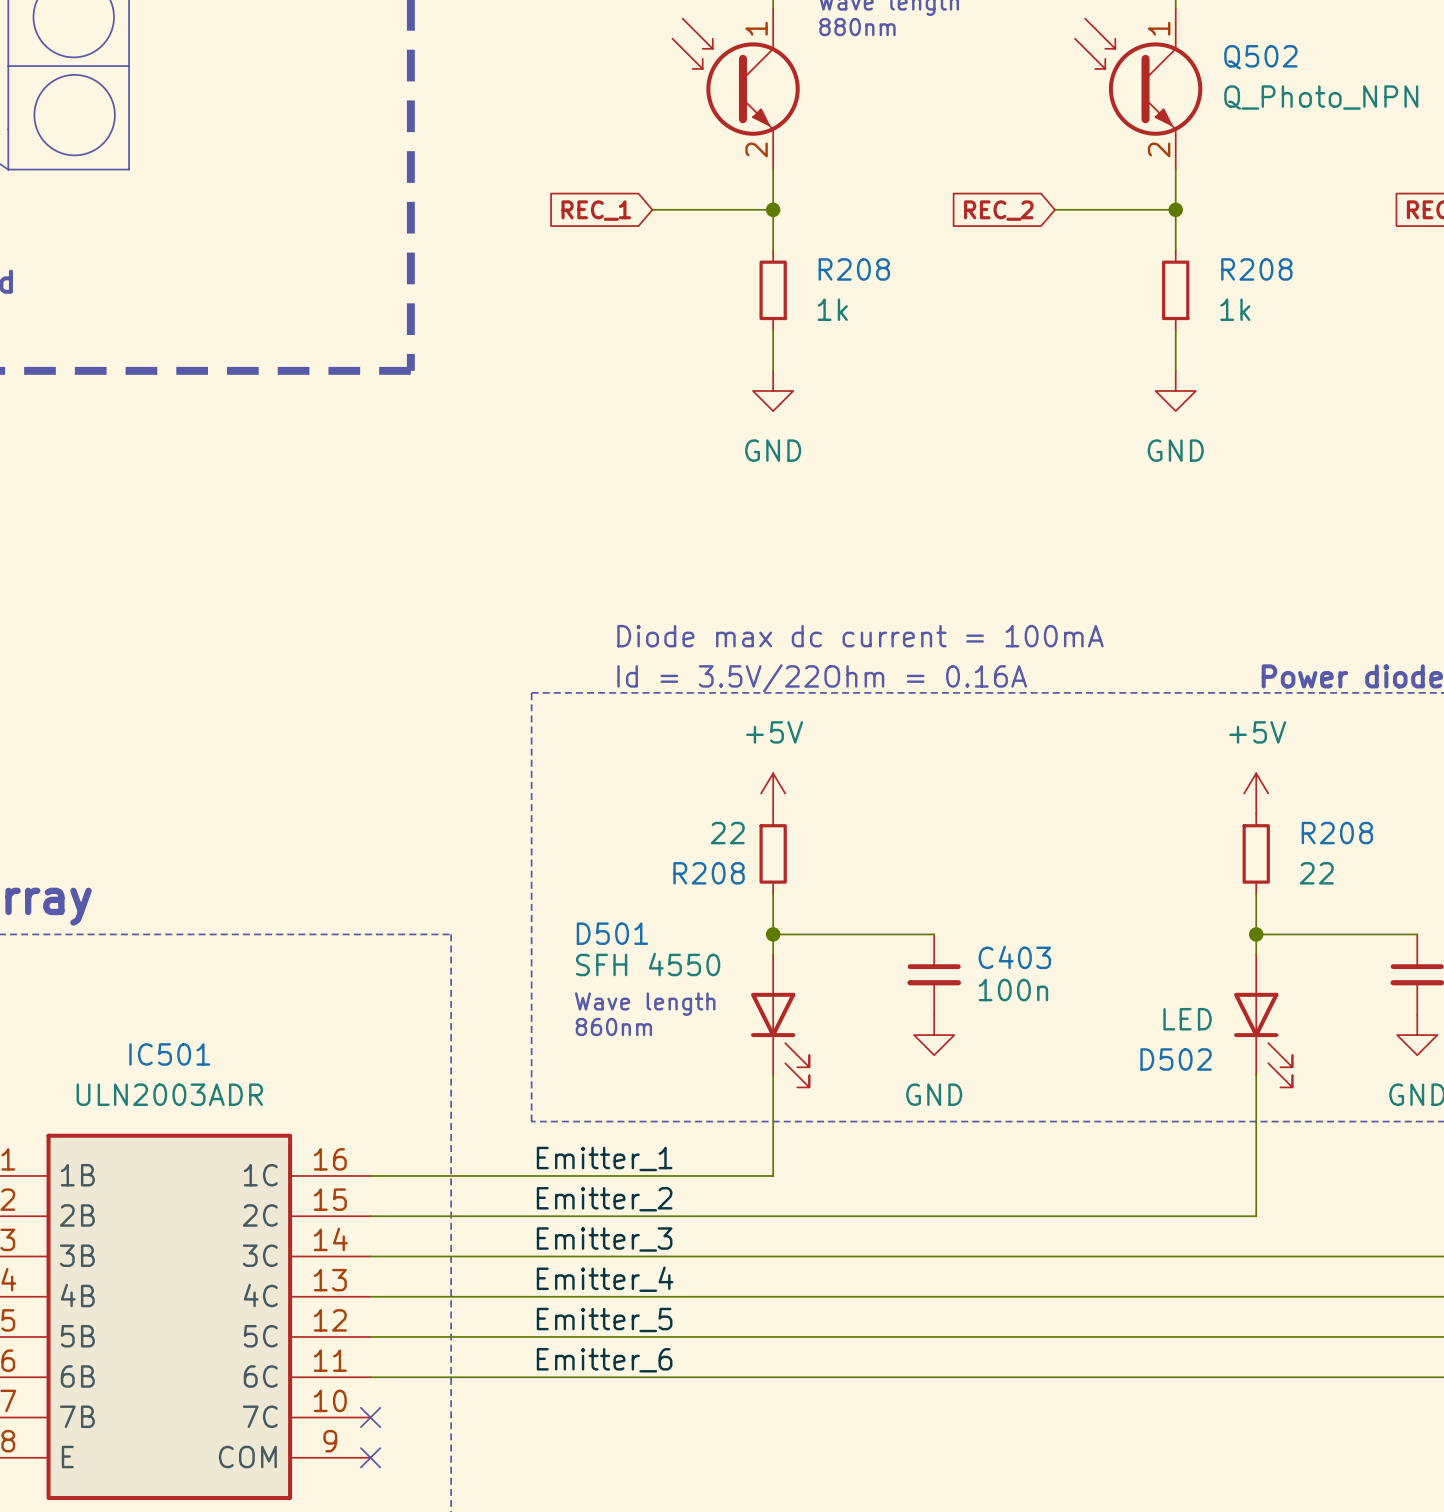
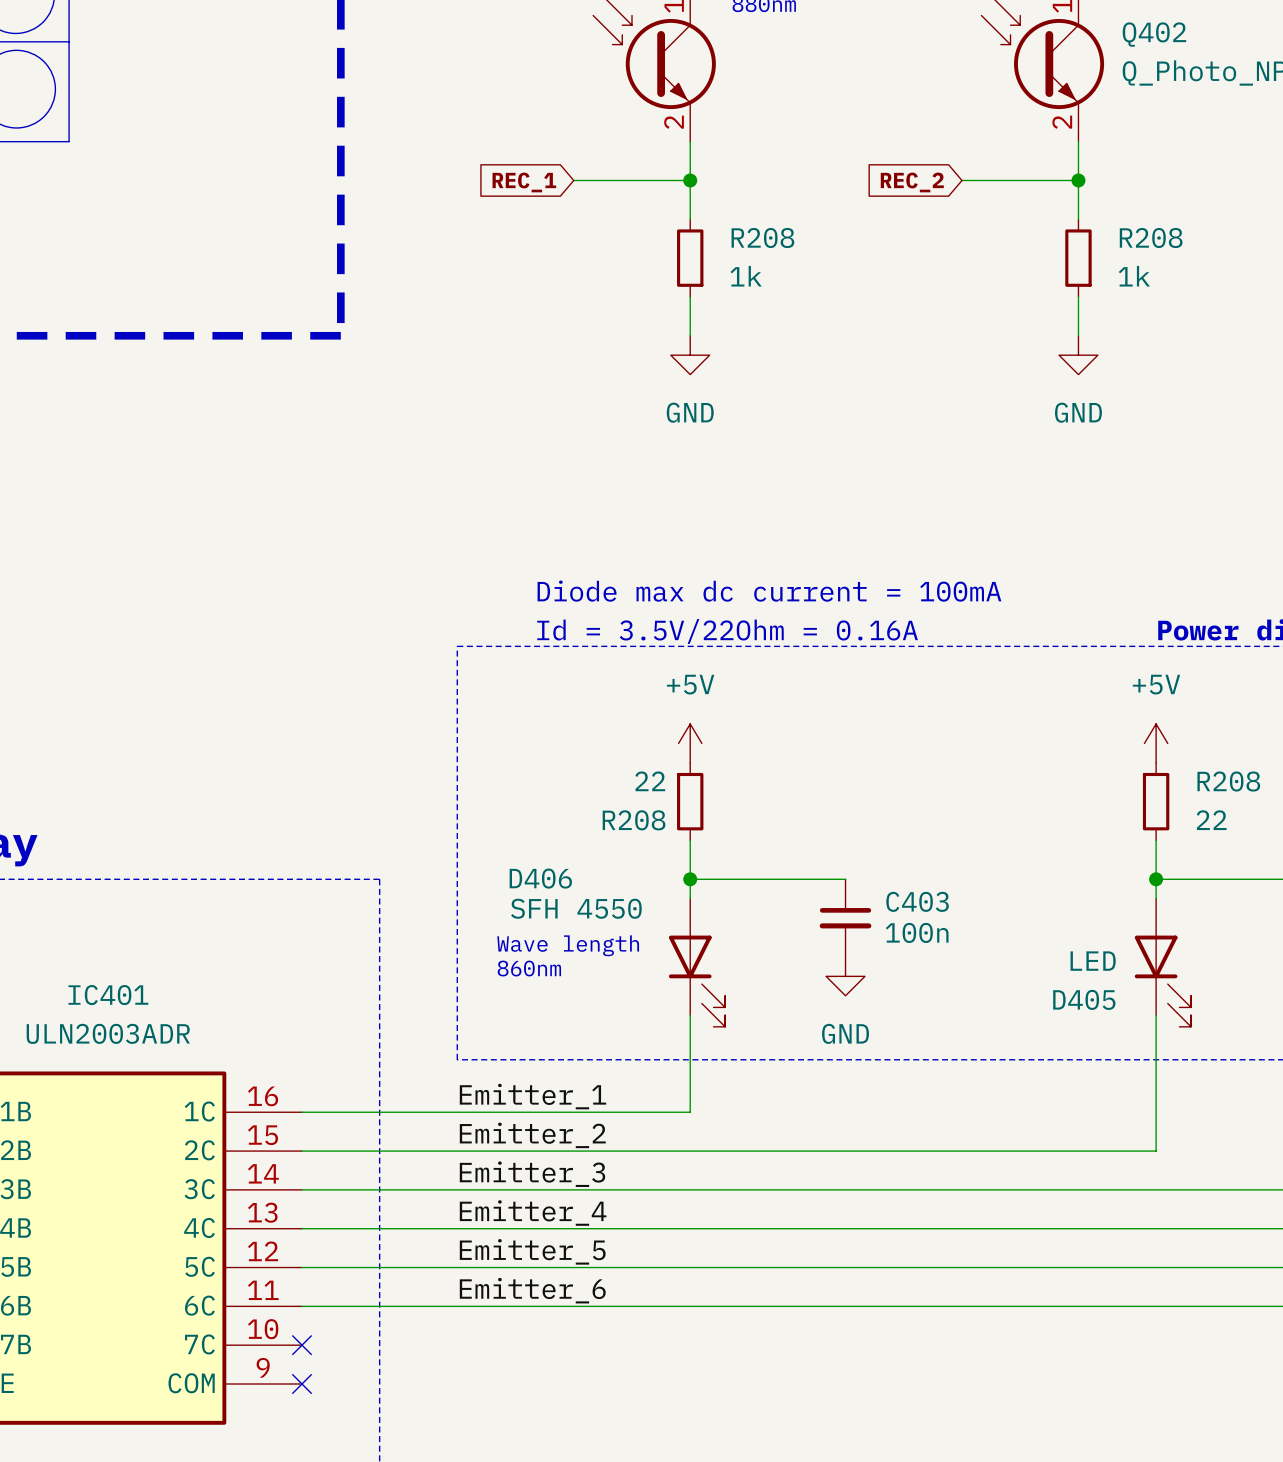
Q502 name: Q502 (1260, 57) -> Q402 (1154, 34)
D501 name: D501 (612, 933) -> D406 (540, 878)
IC501 name: IC501 (169, 1054) -> IC401 (108, 995)
D502 name: D502 (1176, 1059) -> D405 (1084, 999)

